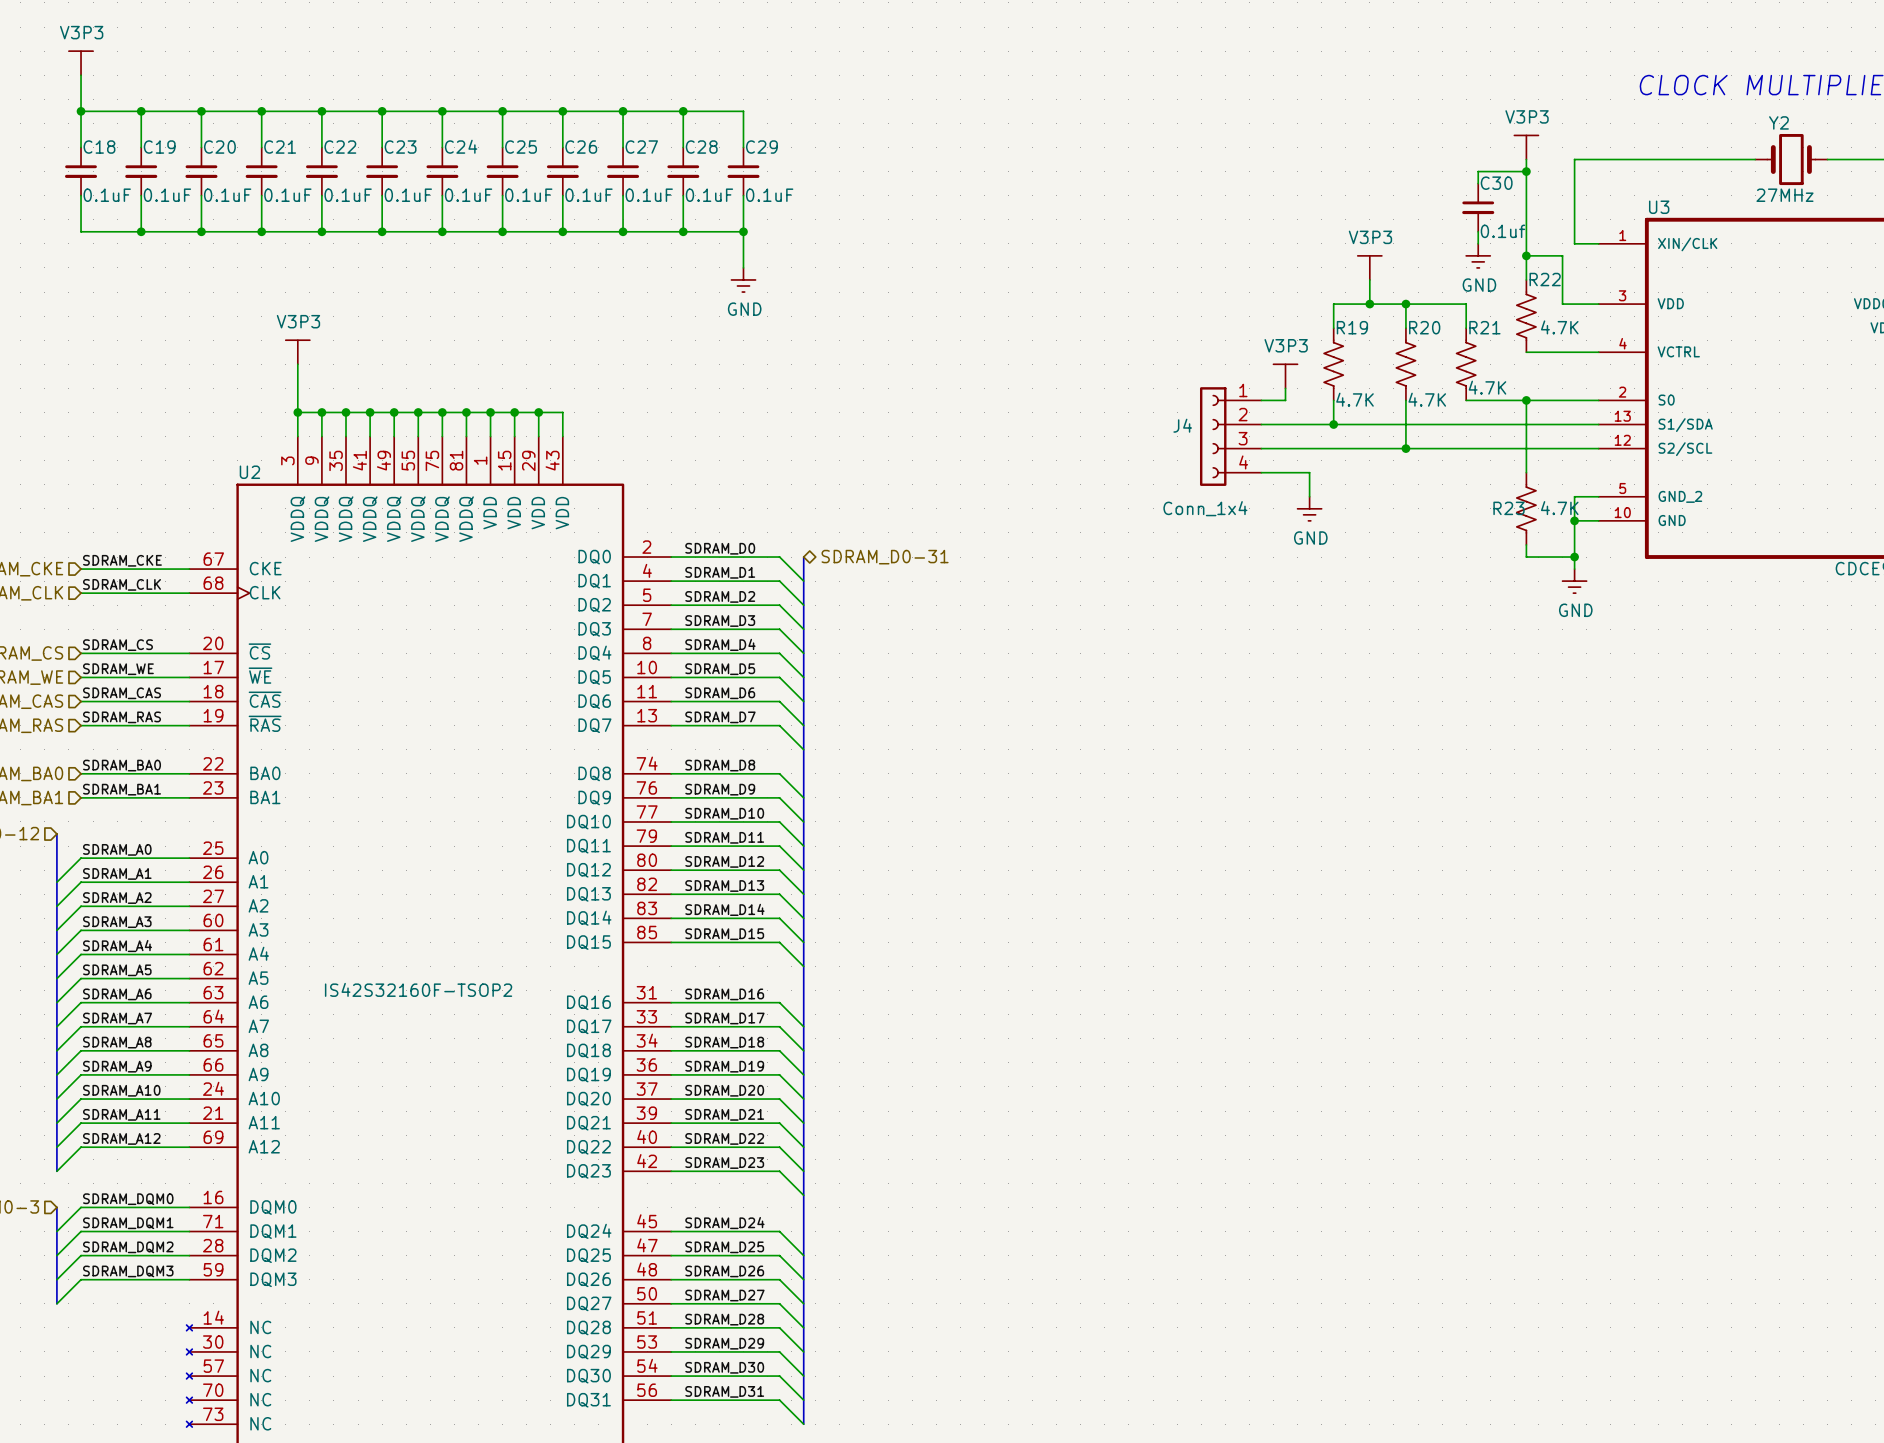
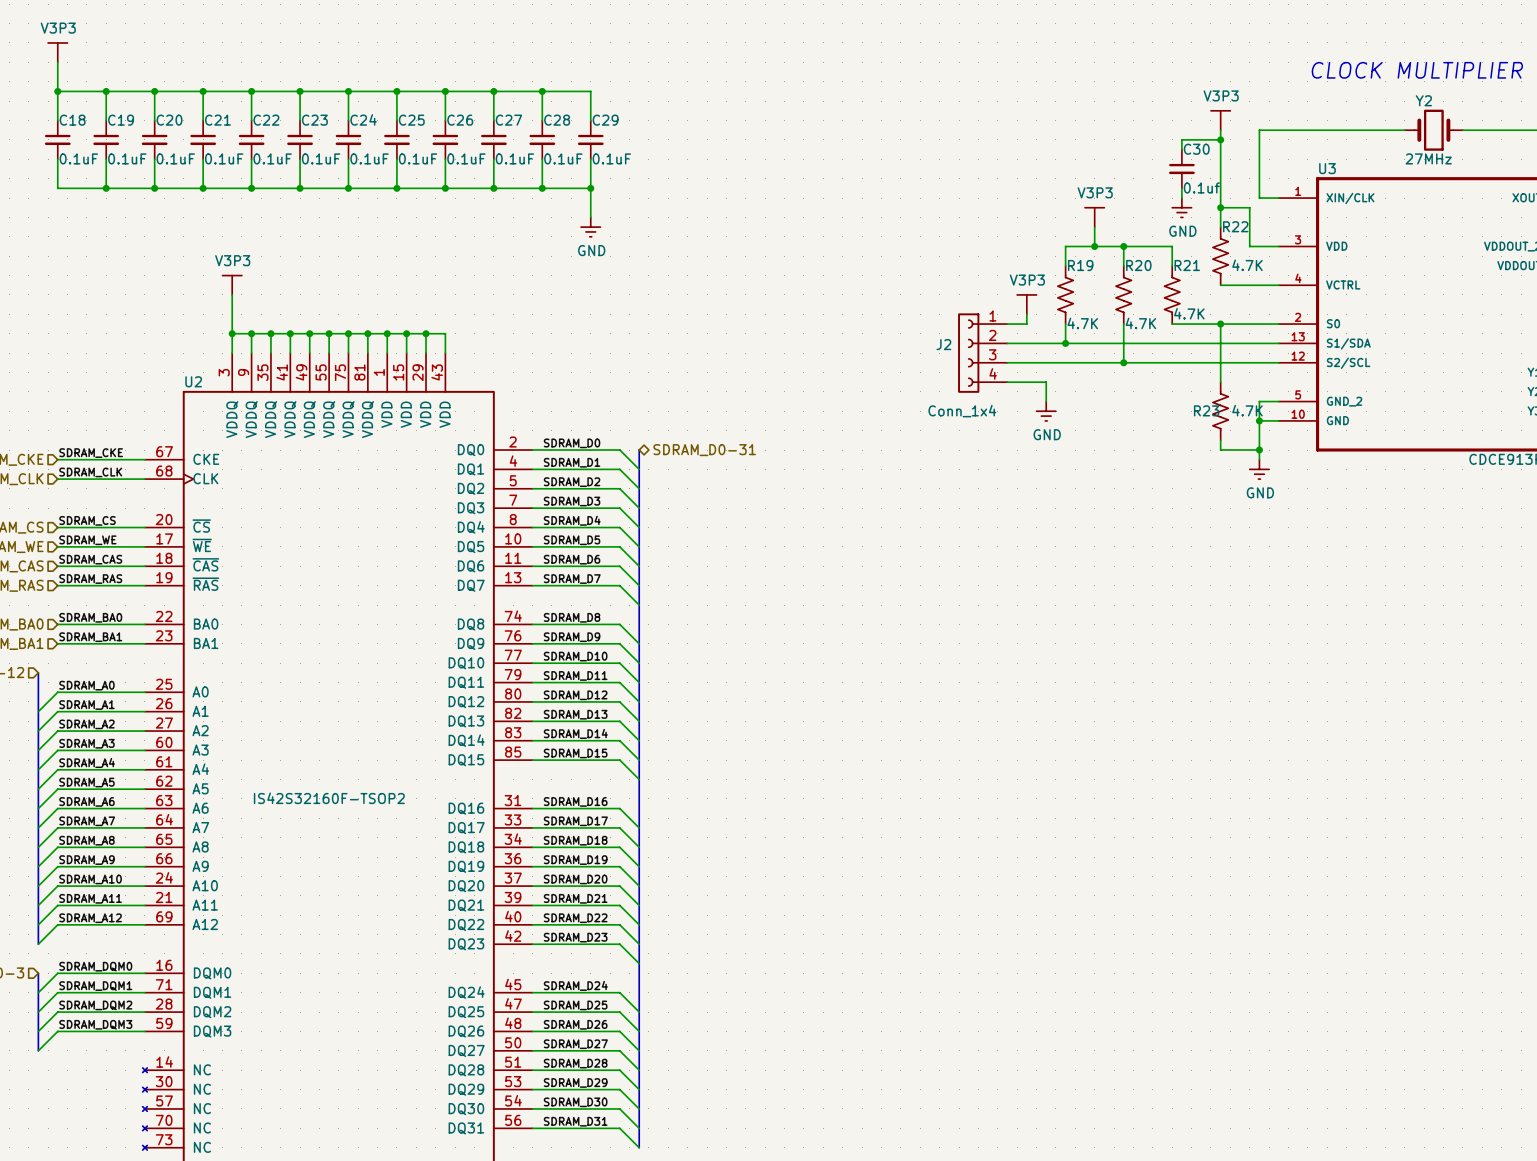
J4 name: J4 (1182, 425) -> J2 (943, 344)

